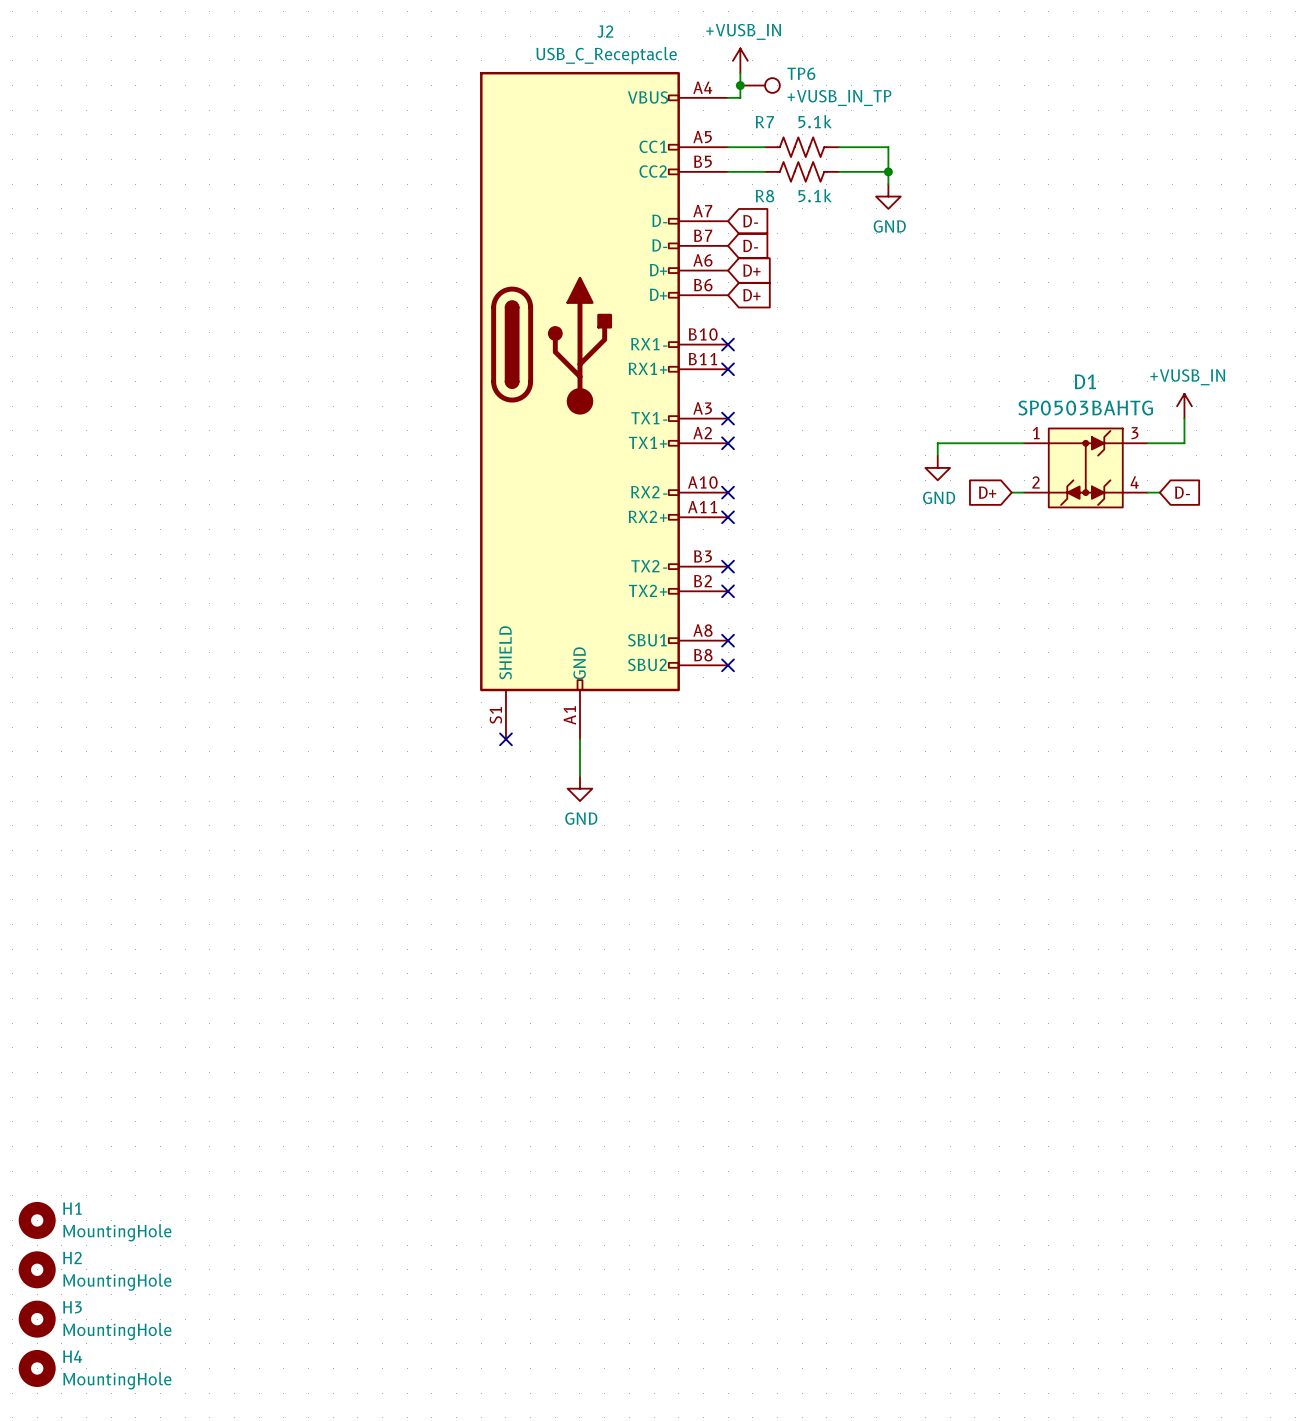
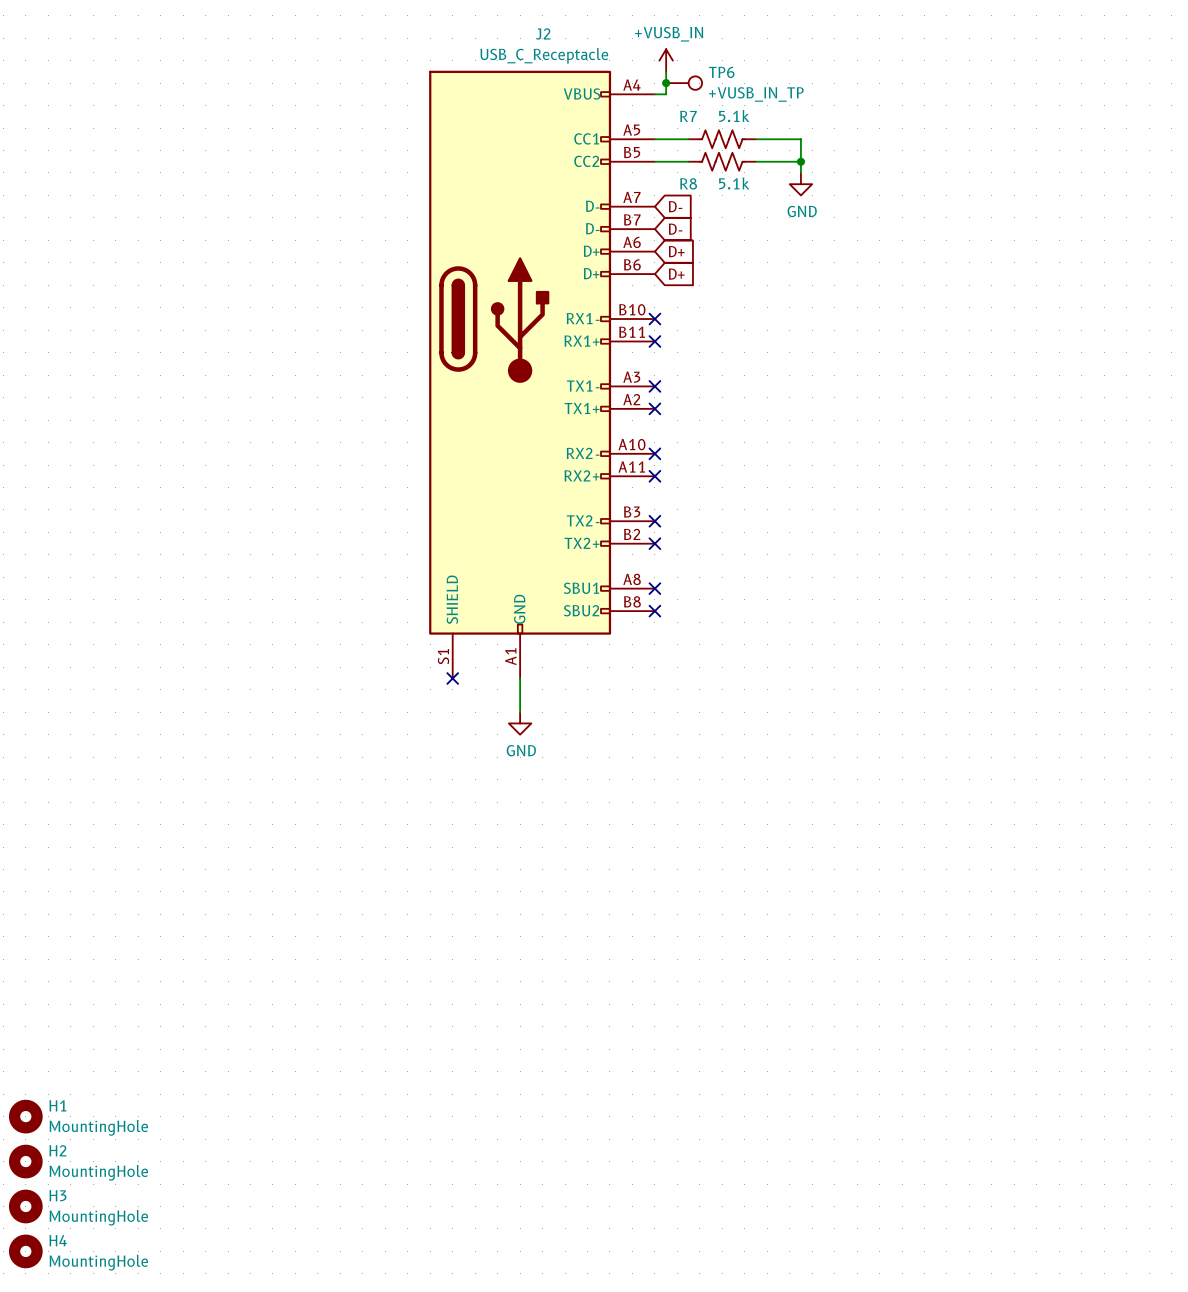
power symbol: +VUSB_IN (1184, 406) -> none
wire: (1184, 418) (1184, 443) (1147, 443) -> none
wire: (1024, 443) (937, 443) (937, 455) -> none
power symbol: GND (937, 467) -> none
D1: SP0503BAHTG (1085, 467) -> none
global label: D+ (987, 492) -> none
wire: (1011, 492) (1024, 492) -> none
wire: (1147, 492) (1159, 492) -> none
global label: D- (1182, 492) -> none

